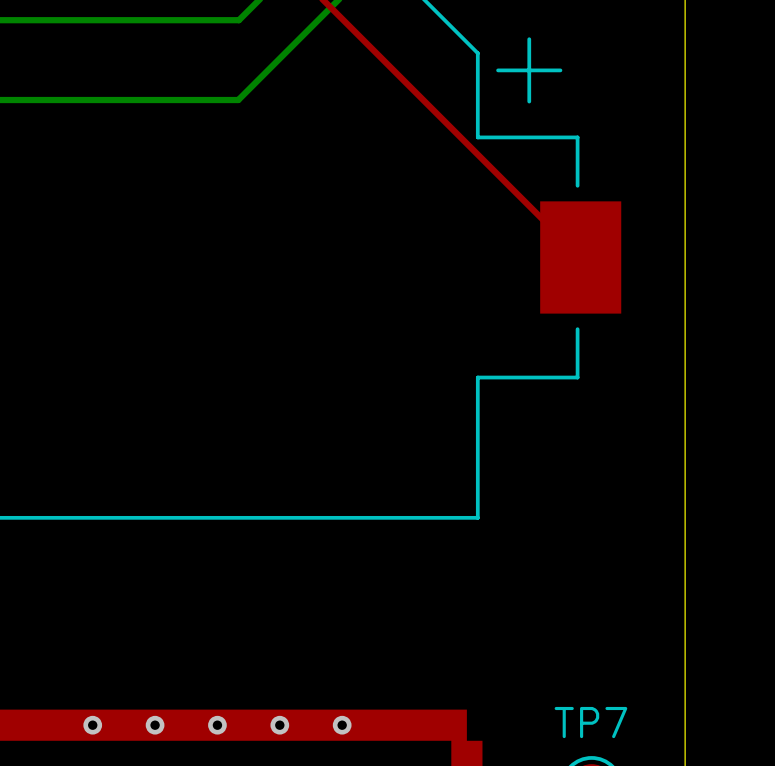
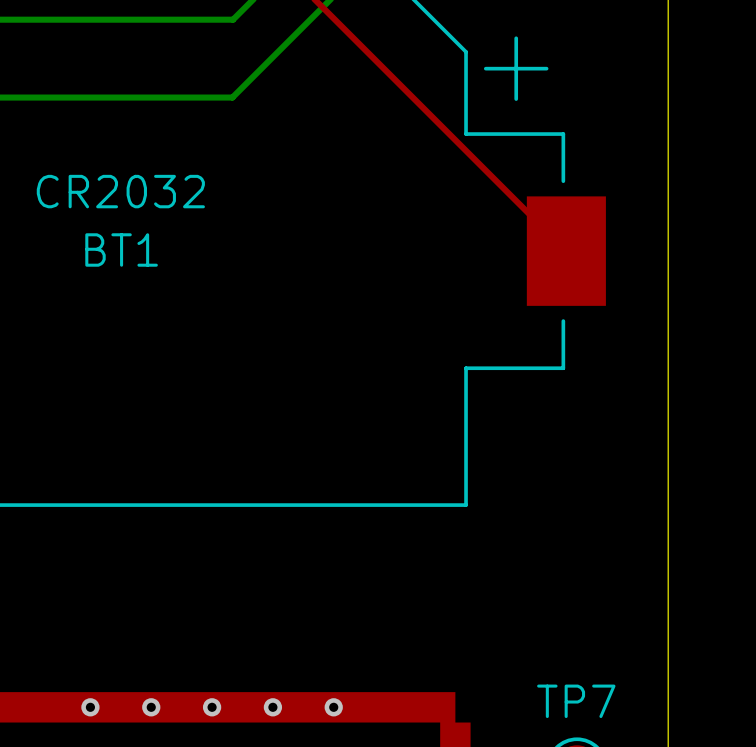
BT1 text: none -> CR2032 (120, 191)
BT1 name: none -> BT1 (121, 249)
TP7 name: none -> TP7 (576, 701)
text: TP7 (590, 722) -> none

